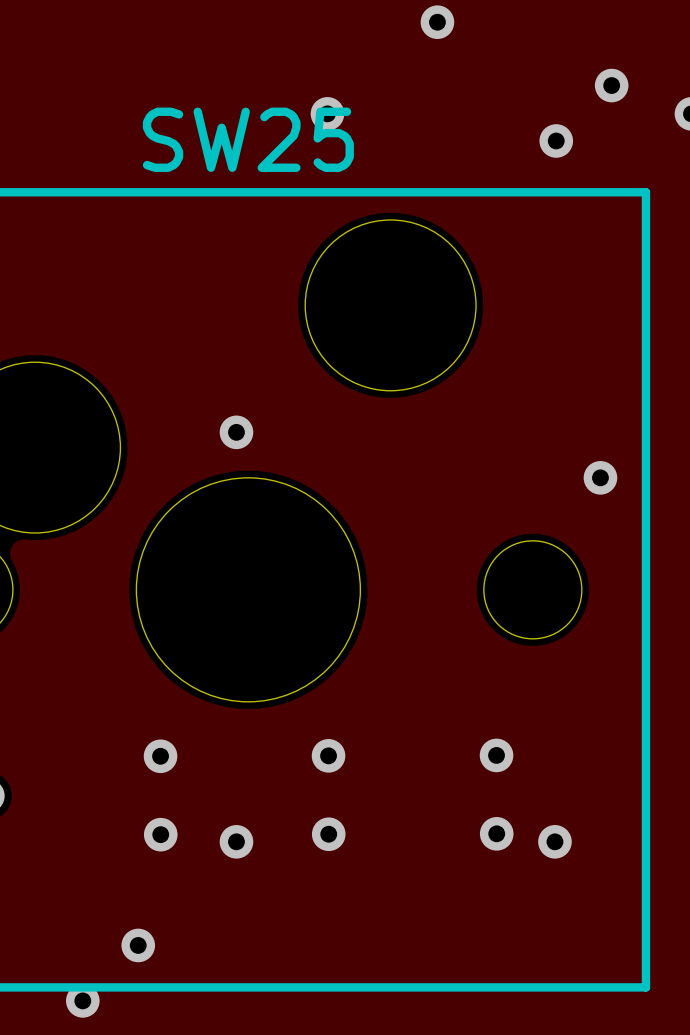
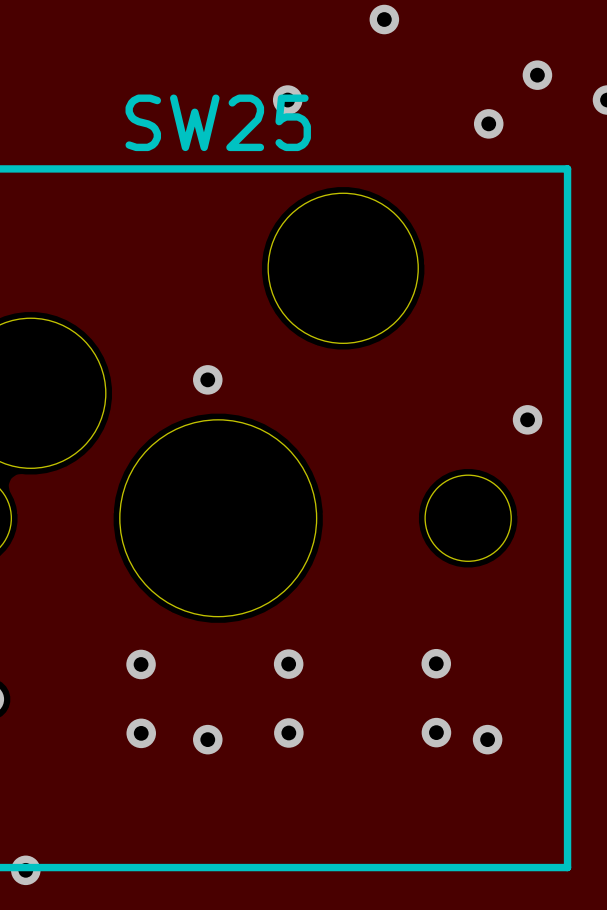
via: (138, 945) -> none
via position: (82, 1000) -> (25, 870)

